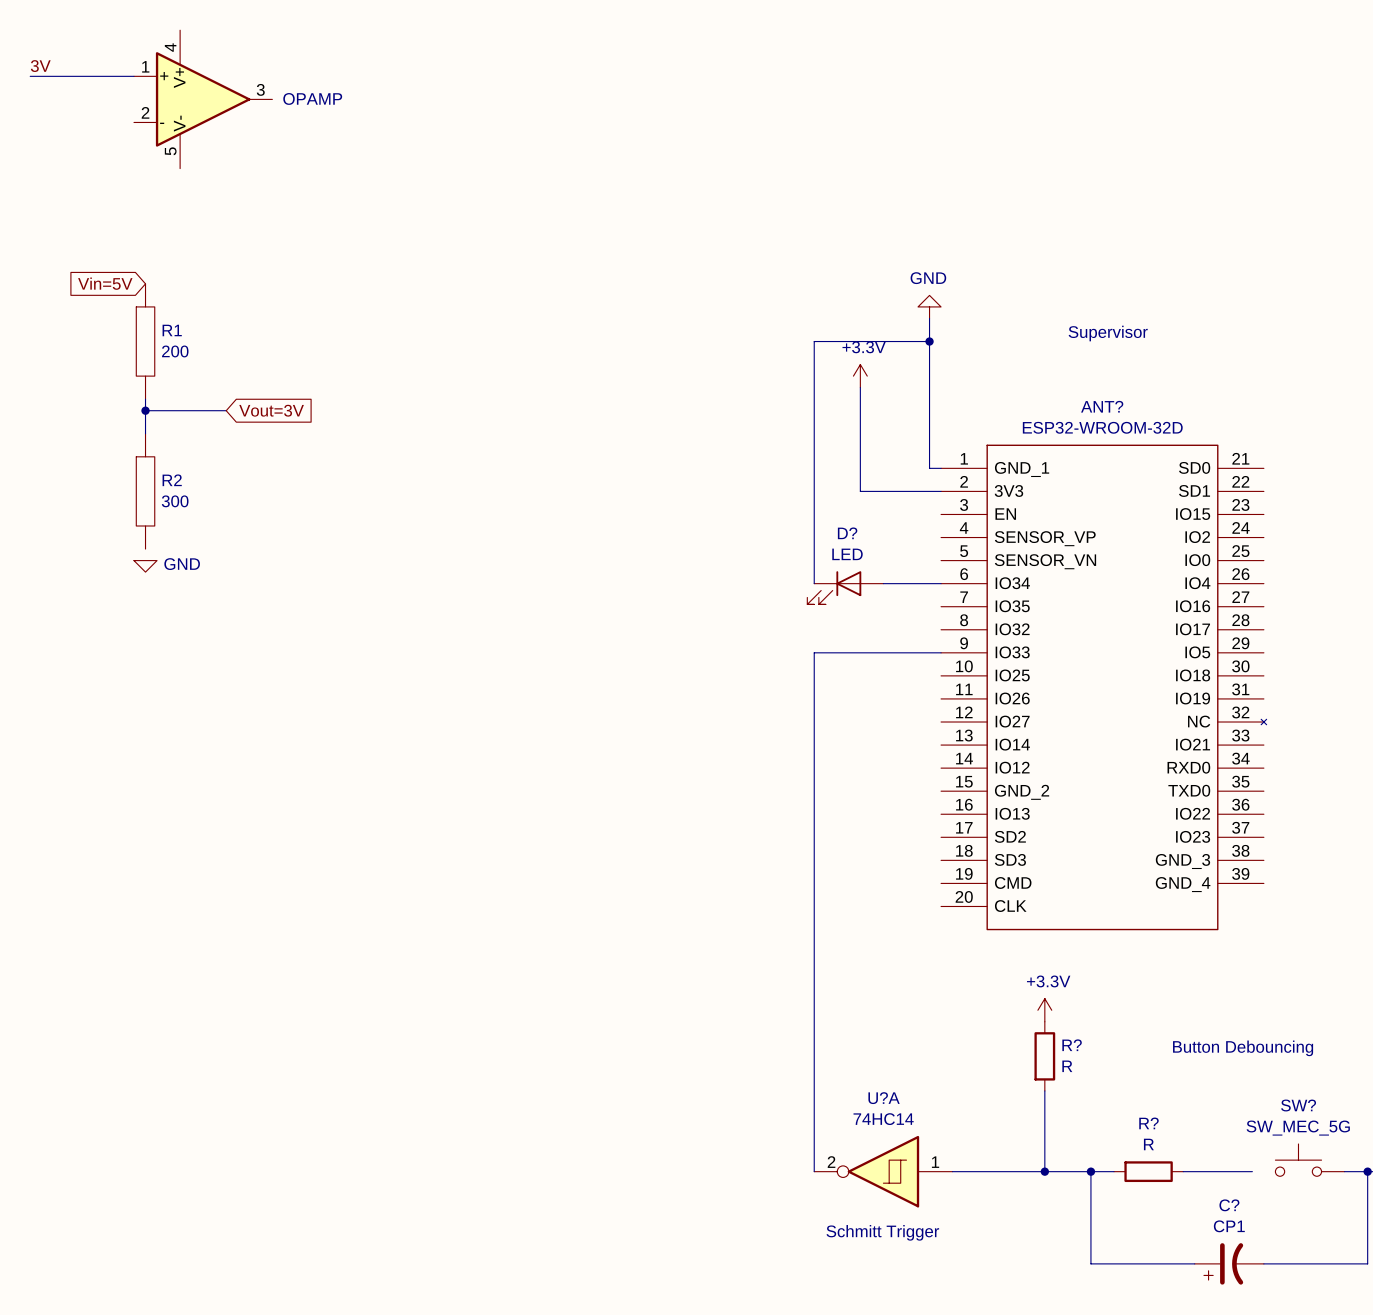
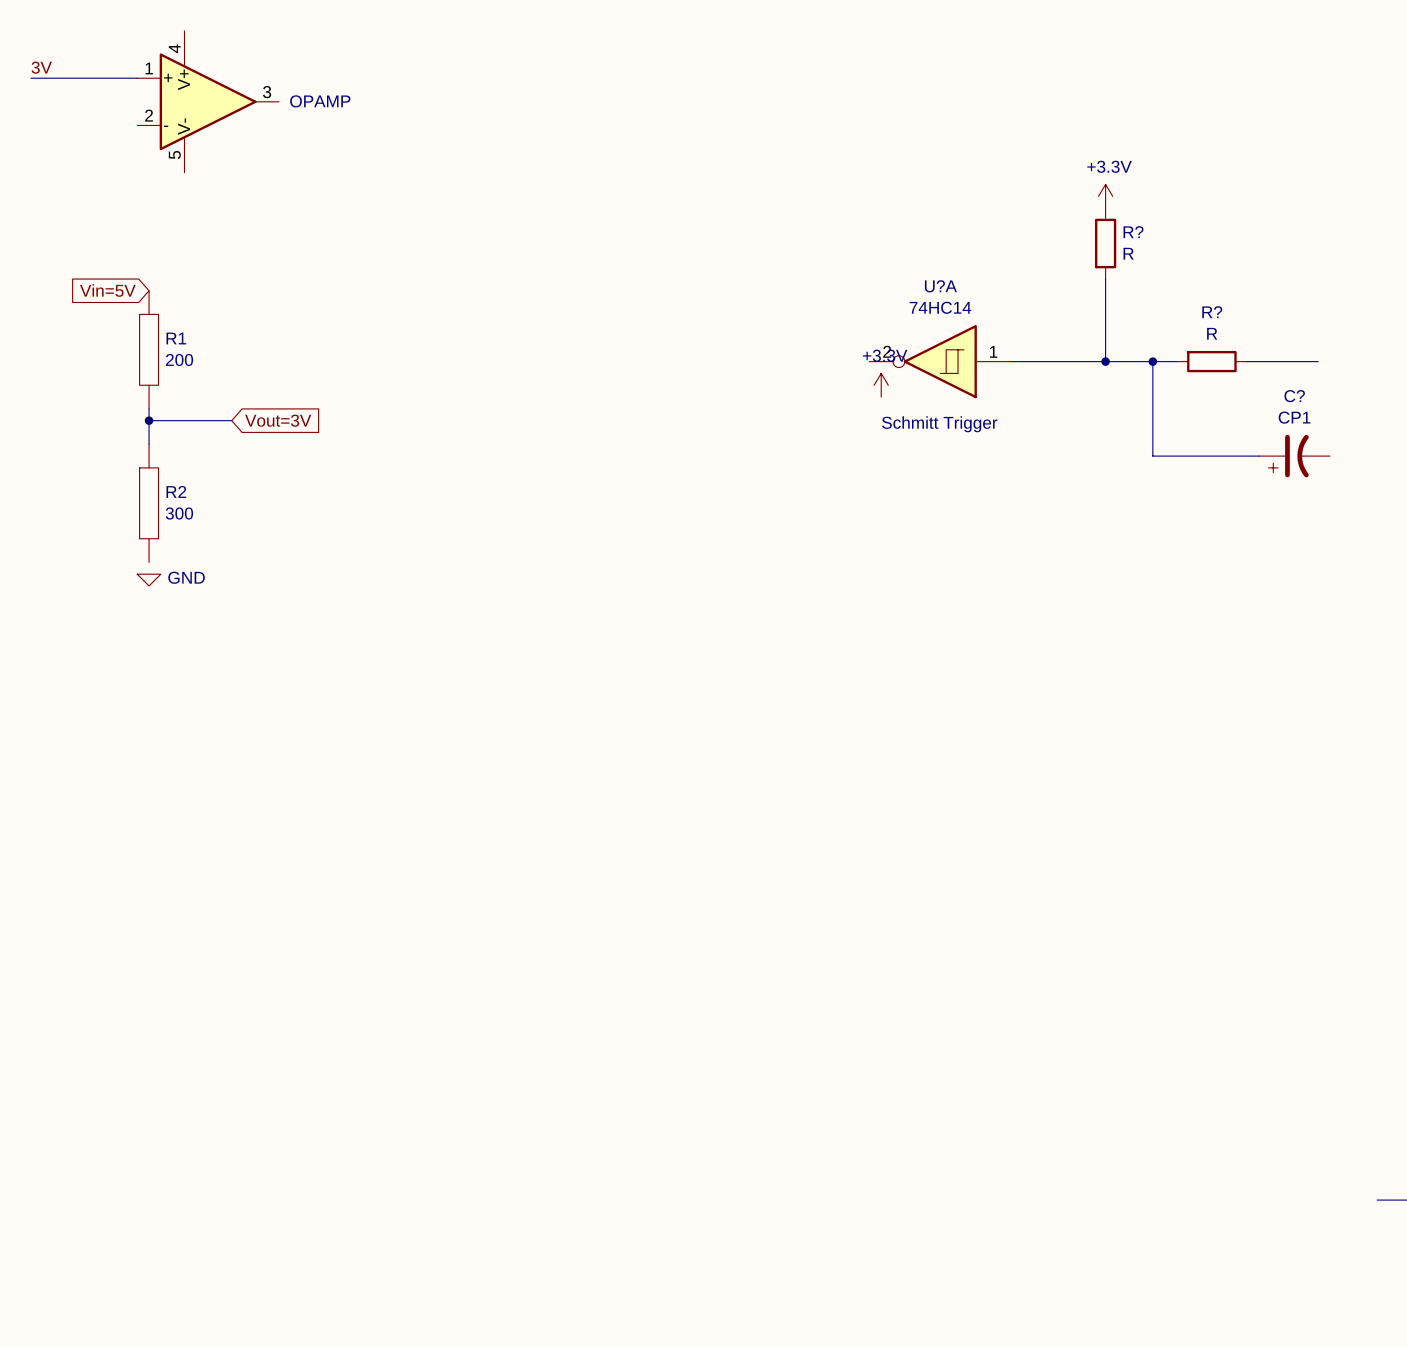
power symbol: none -> +3.3V (1105, 196)
R?: none -> R (1105, 243)
wire: none -> (1105, 278) (1105, 361)
power symbol: GND (929, 306) -> none
wire: (929, 318) (929, 468) (941, 468) -> none
text: Supervisor (1108, 333) -> none
wire: (929, 341) (814, 341) (814, 583) -> none
junction: (929, 341) -> none
U?A: none -> 74HC14 (940, 361)
wire: none -> (1011, 361) (1176, 361)
junction: none -> (1105, 361)
wire: none -> (1152, 361) (1152, 456) (1259, 456)
junction: none -> (1152, 361)
R?: none -> R (1211, 361)
wire: none -> (1247, 361) (1318, 361)
wire: (860, 387) (860, 491) (941, 491) -> none
text: none -> Schmitt Trigger (939, 424)
C?: none -> CP1 (1294, 456)
wire: (883, 583) (941, 583) -> none
D?: LED (845, 587) -> none
wire: (941, 652) (814, 652) (814, 1171) -> none
ANT?: ESP32-WROOM-32D (1103, 687) -> none
power symbol: +3.3V (1044, 1010) -> none
text: Button Debouncing (1243, 1048) -> none
R?: R (1044, 1056) -> none
wire: (1044, 1090) (1044, 1171) -> none
SW?: SW_MEC_5G (1310, 1160) -> none
U?A: 74HC14 (883, 1171) -> none
wire: (952, 1171) (1114, 1171) -> none
junction: (1044, 1171) -> none
wire: (1090, 1171) (1090, 1263) (1194, 1263) -> none
junction: (1090, 1171) -> none
R?: R (1148, 1171) -> none
wire: (1183, 1171) (1252, 1171) -> none
wire: (1367, 1171) (1367, 1263) (1263, 1263) -> none
junction: (1367, 1171) -> none
text: Schmitt Trigger (882, 1232) -> none
C?: CP1 (1229, 1263) -> none

